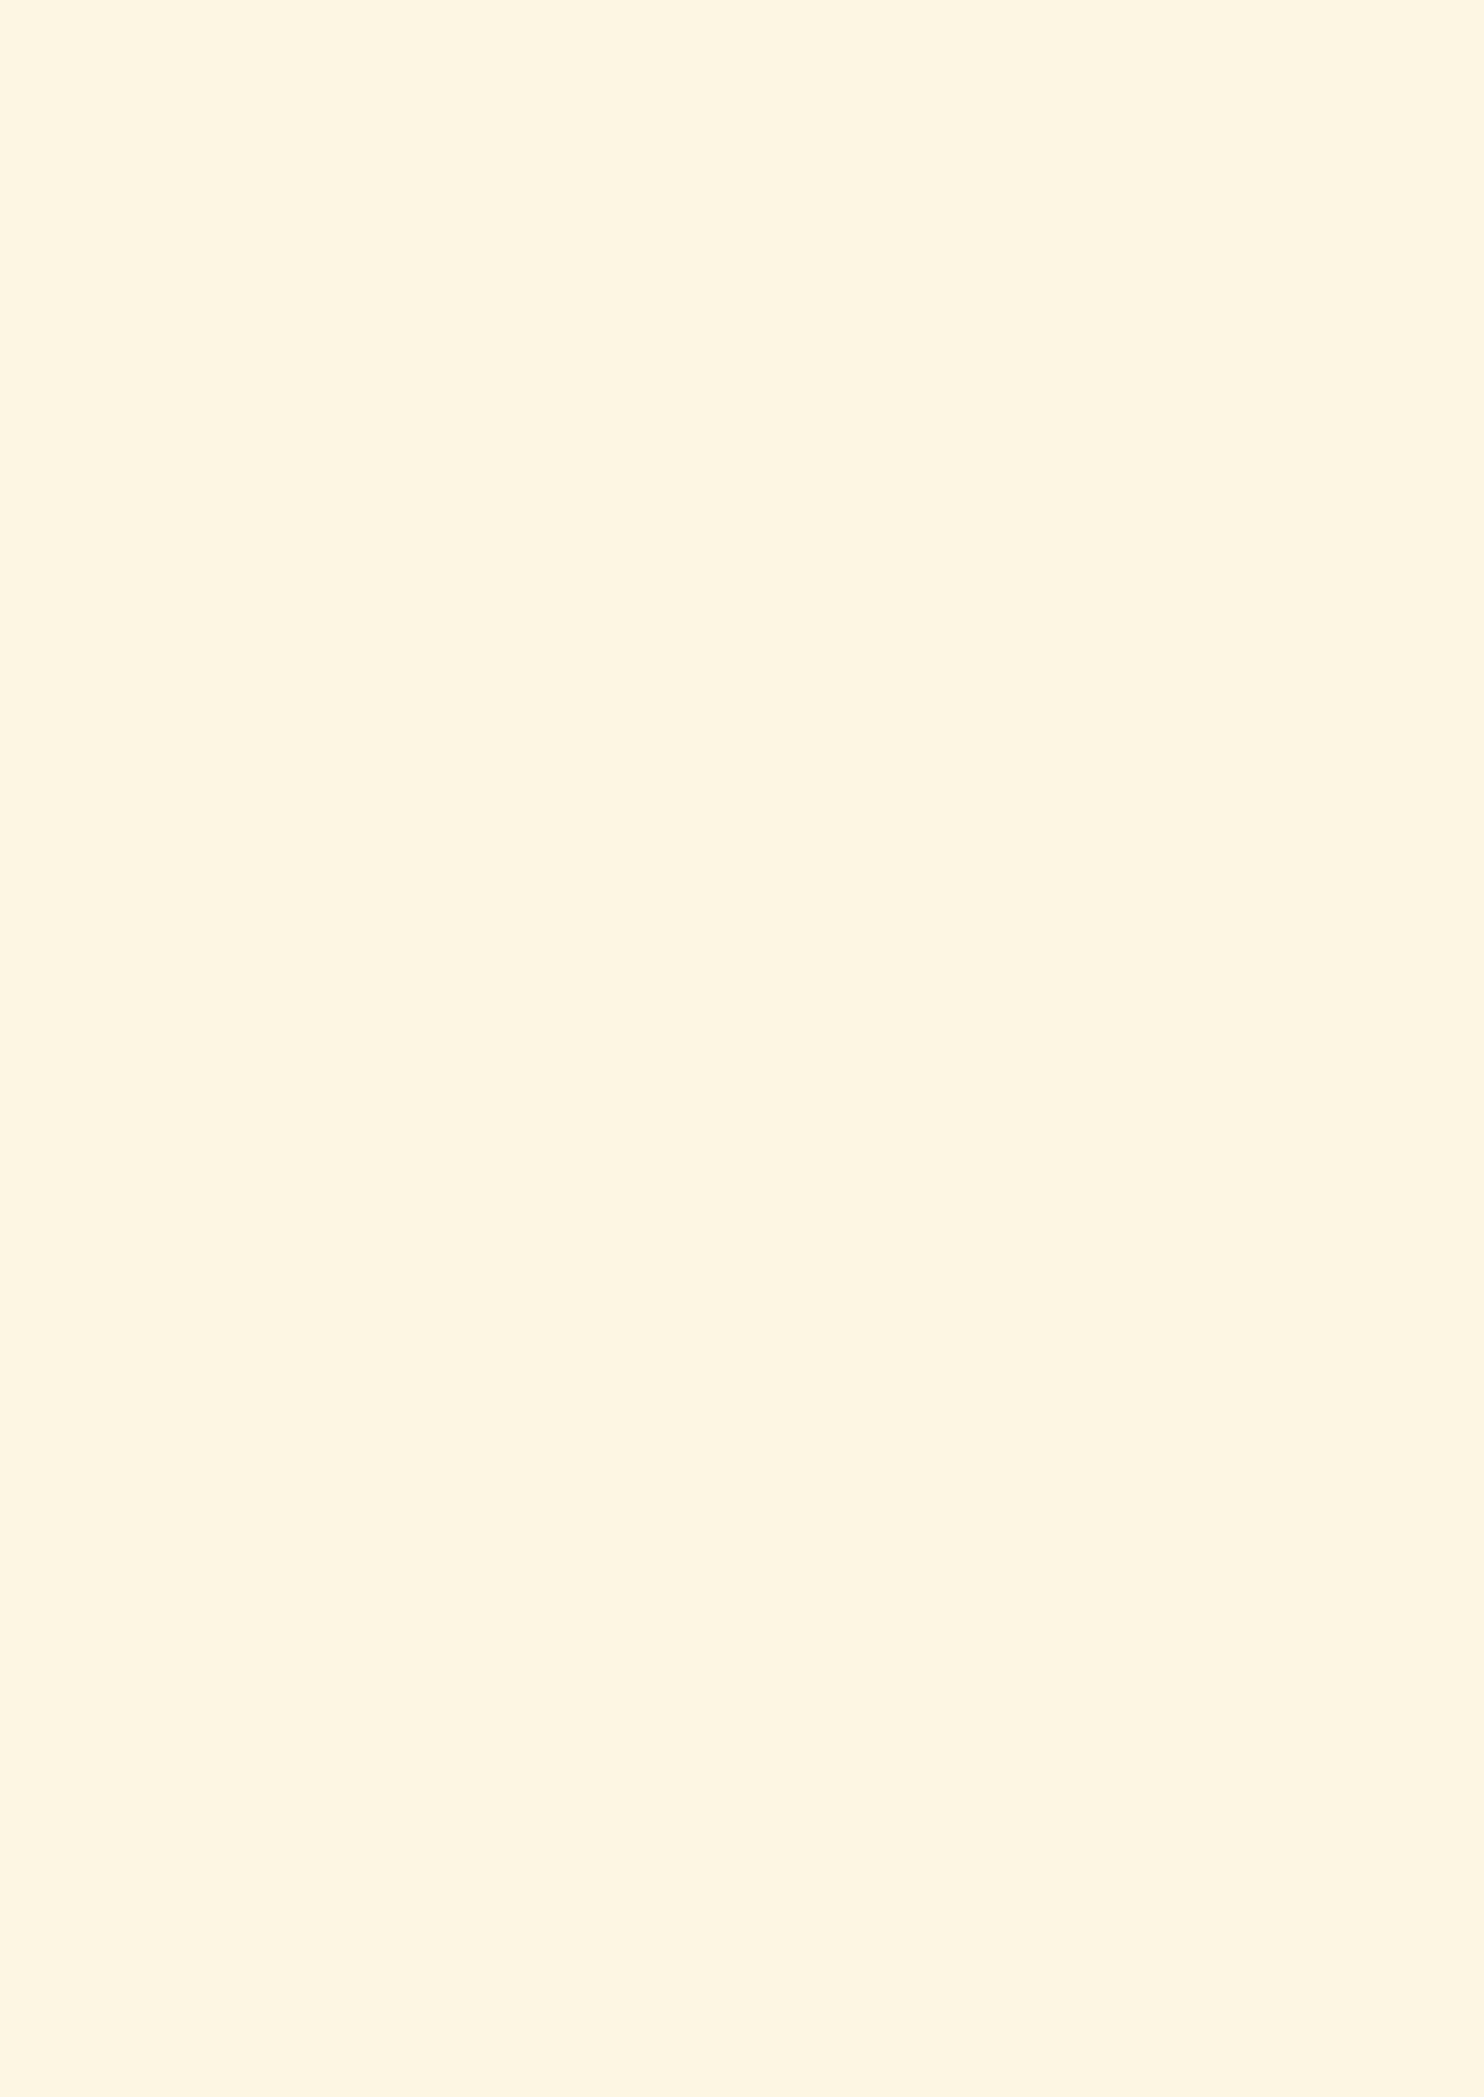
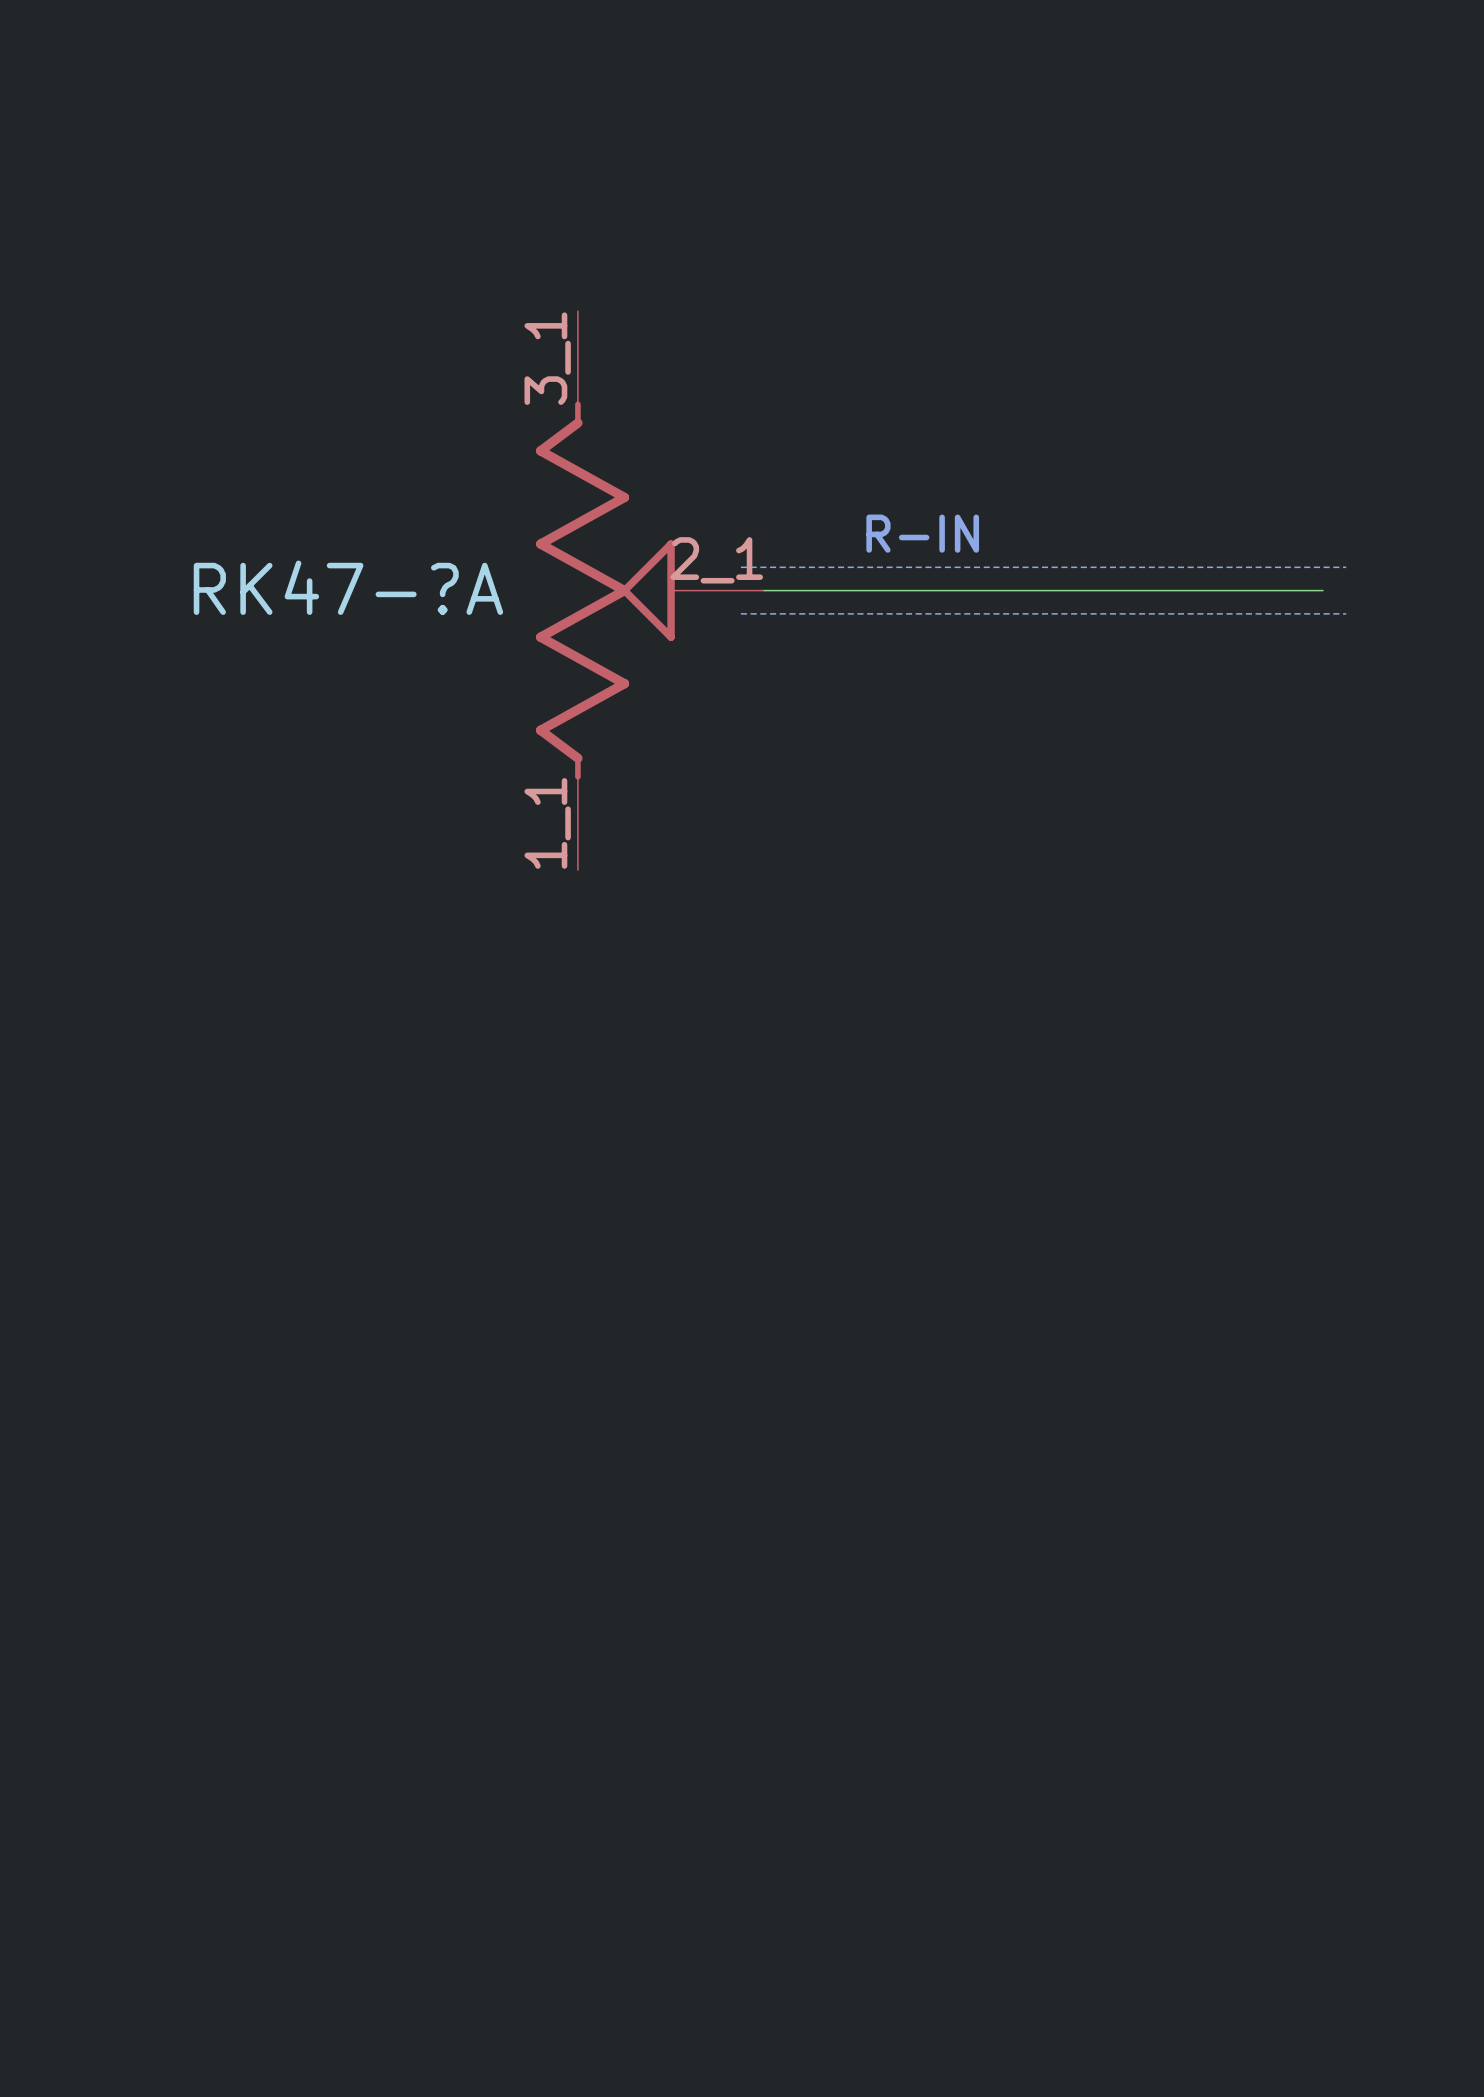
text: none -> R-IN (922, 533)
line: none -> (740, 567) (1346, 567)
RK47-?A: none -> (650, 590)
wire: none -> (764, 590) (1322, 590)
line: none -> (740, 613) (1346, 613)

